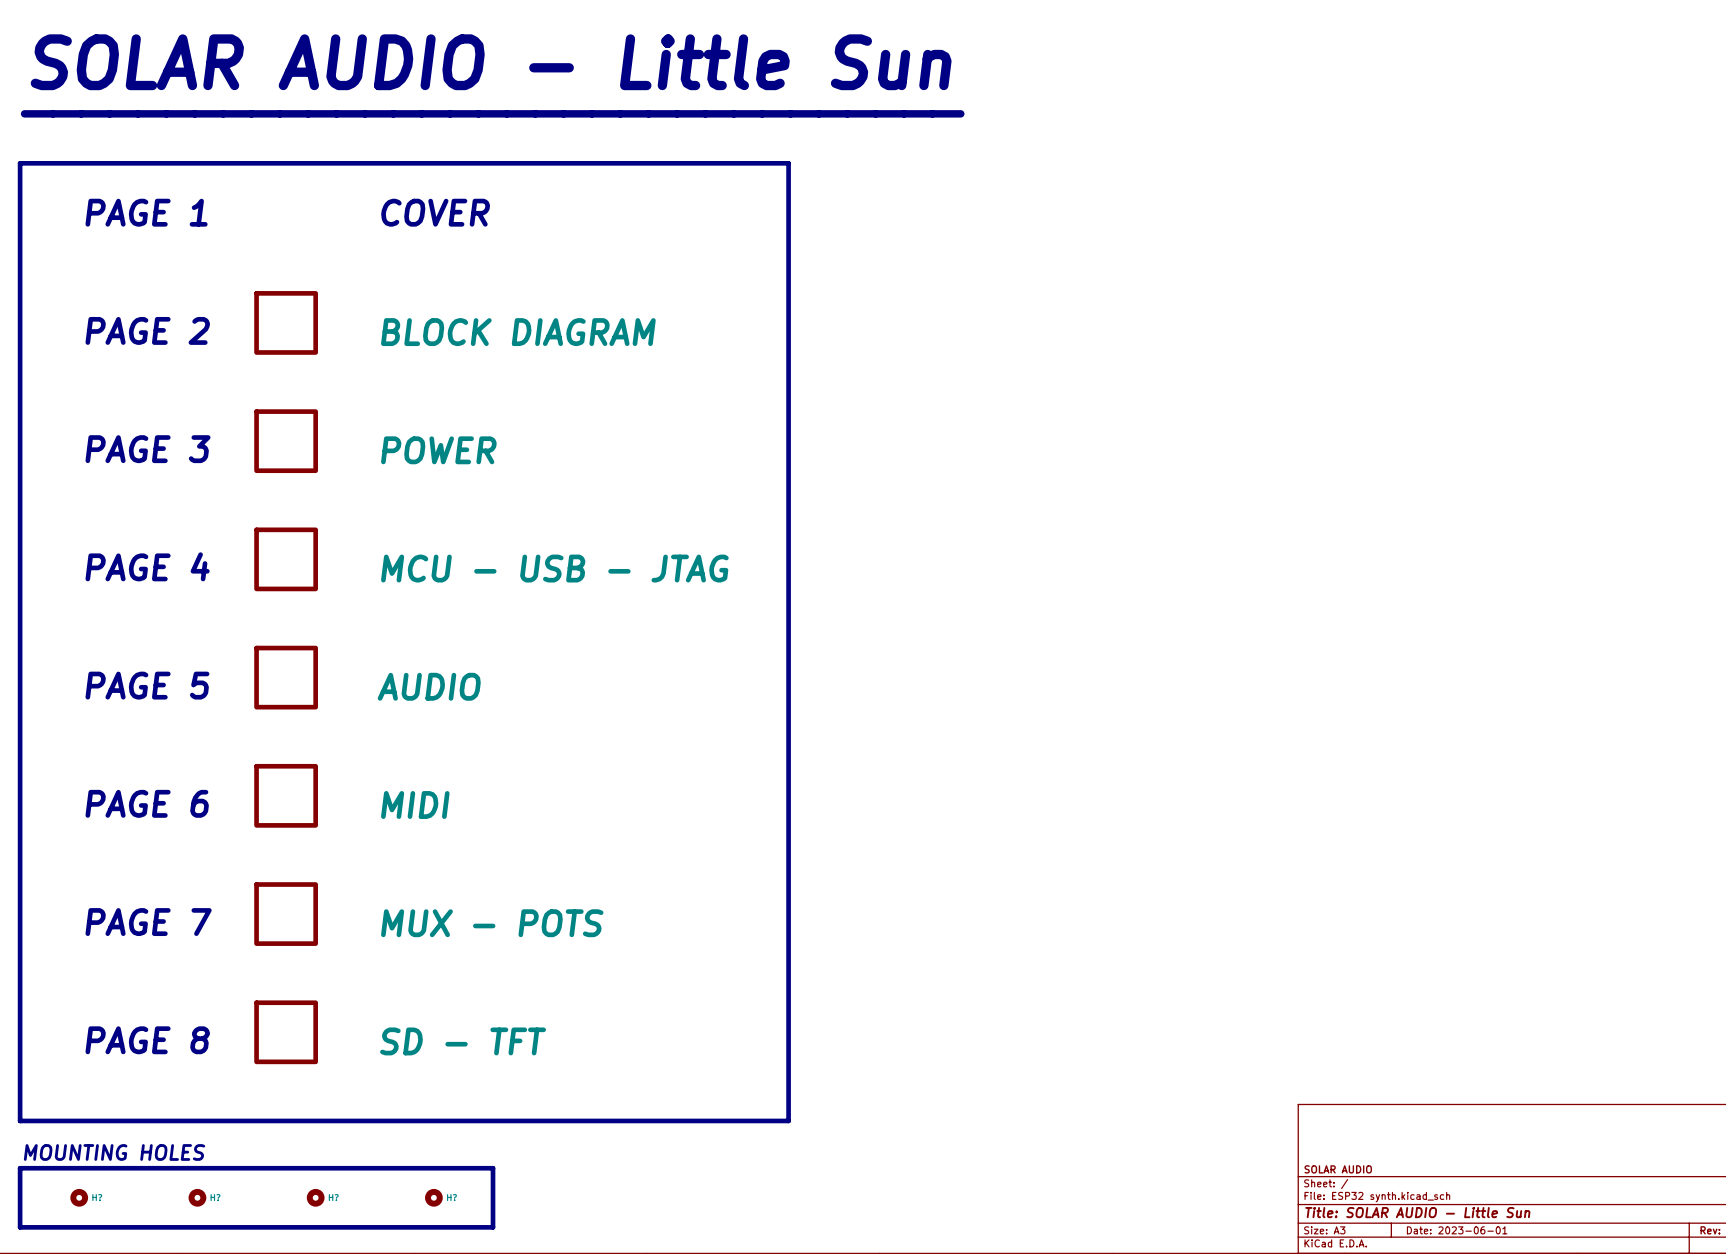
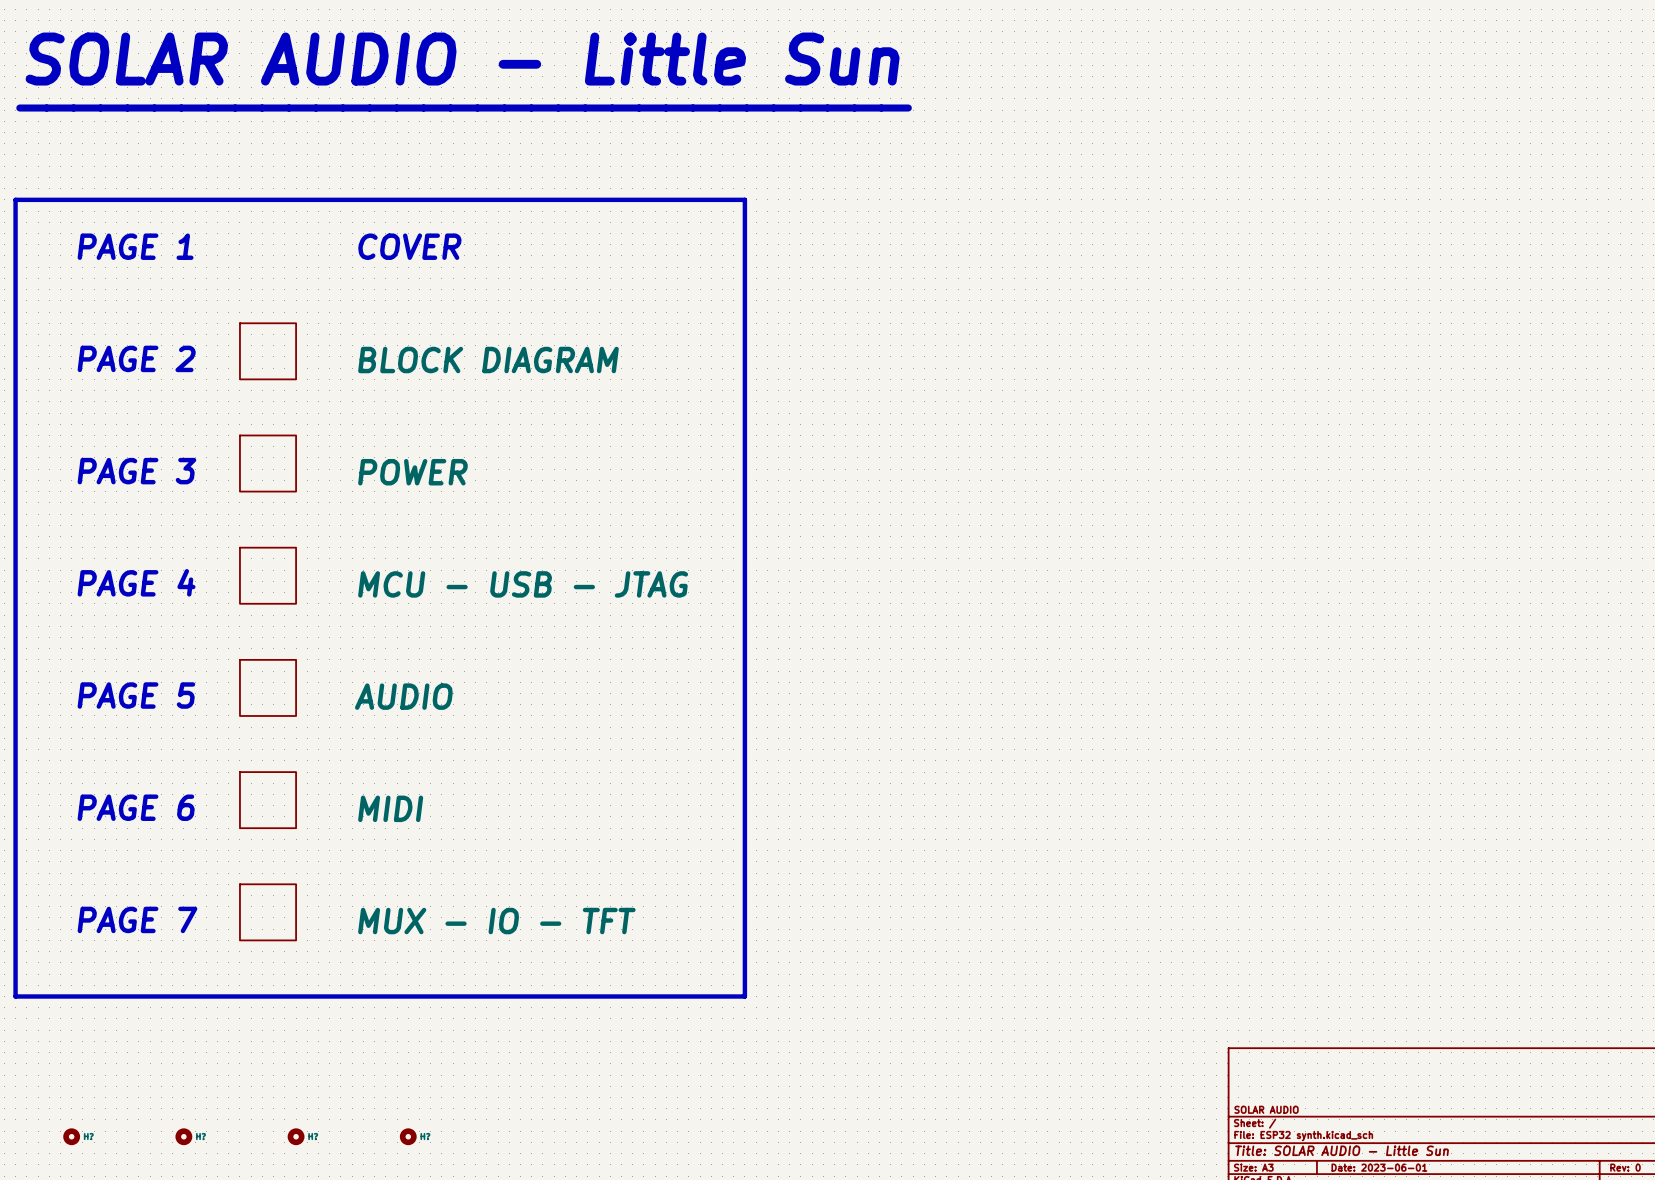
line: (20, 210) (20, 163) (788, 163) (788, 210) -> (15, 199) (744, 199)
text position: PAGE 1 (146, 212) -> PAGE 1 (135, 246)
text position: COVER (435, 212) -> COVER (409, 246)
sheet BLOCK DIAGRAM: (286, 322) -> none
text position: PAGE 2 (147, 330) -> PAGE 2 (136, 358)
sheet BLOCK DIAGRAM: none -> (268, 351)
sheet POWER: (286, 441) -> none
text position: PAGE 3 (148, 449) -> PAGE 3 (136, 471)
sheet POWER: none -> (268, 463)
sheet MCU - USB - JTAG: (286, 559) -> none
text position: PAGE 4 (147, 566) -> PAGE 4 (136, 582)
sheet MCU - USB - JTAG: none -> (268, 575)
sheet AUDIO: (286, 677) -> none
text position: PAGE 5 (147, 685) -> PAGE 5 (136, 695)
sheet AUDIO: none -> (268, 687)
sheet MIDI: (286, 795) -> none
text position: PAGE 6 (147, 803) -> PAGE 6 (136, 807)
sheet MIDI: none -> (268, 800)
sheet MUX - POTS: (286, 914) -> none
text position: PAGE 7 (148, 922) -> PAGE 7 (137, 919)
sheet MUX - IO - TFT: none -> (268, 912)
sheet SD - TFT: (286, 1032) -> none
text: PAGE 8 (147, 1040) -> none
line: (20, 1050) (20, 1120) (788, 1120) (788, 1050) -> (15, 996) (744, 996)
text: MOUNTING HOLES (114, 1152) -> none
line: (20, 1168) (493, 1168) (493, 1227) (20, 1227) (20, 1168) -> none

